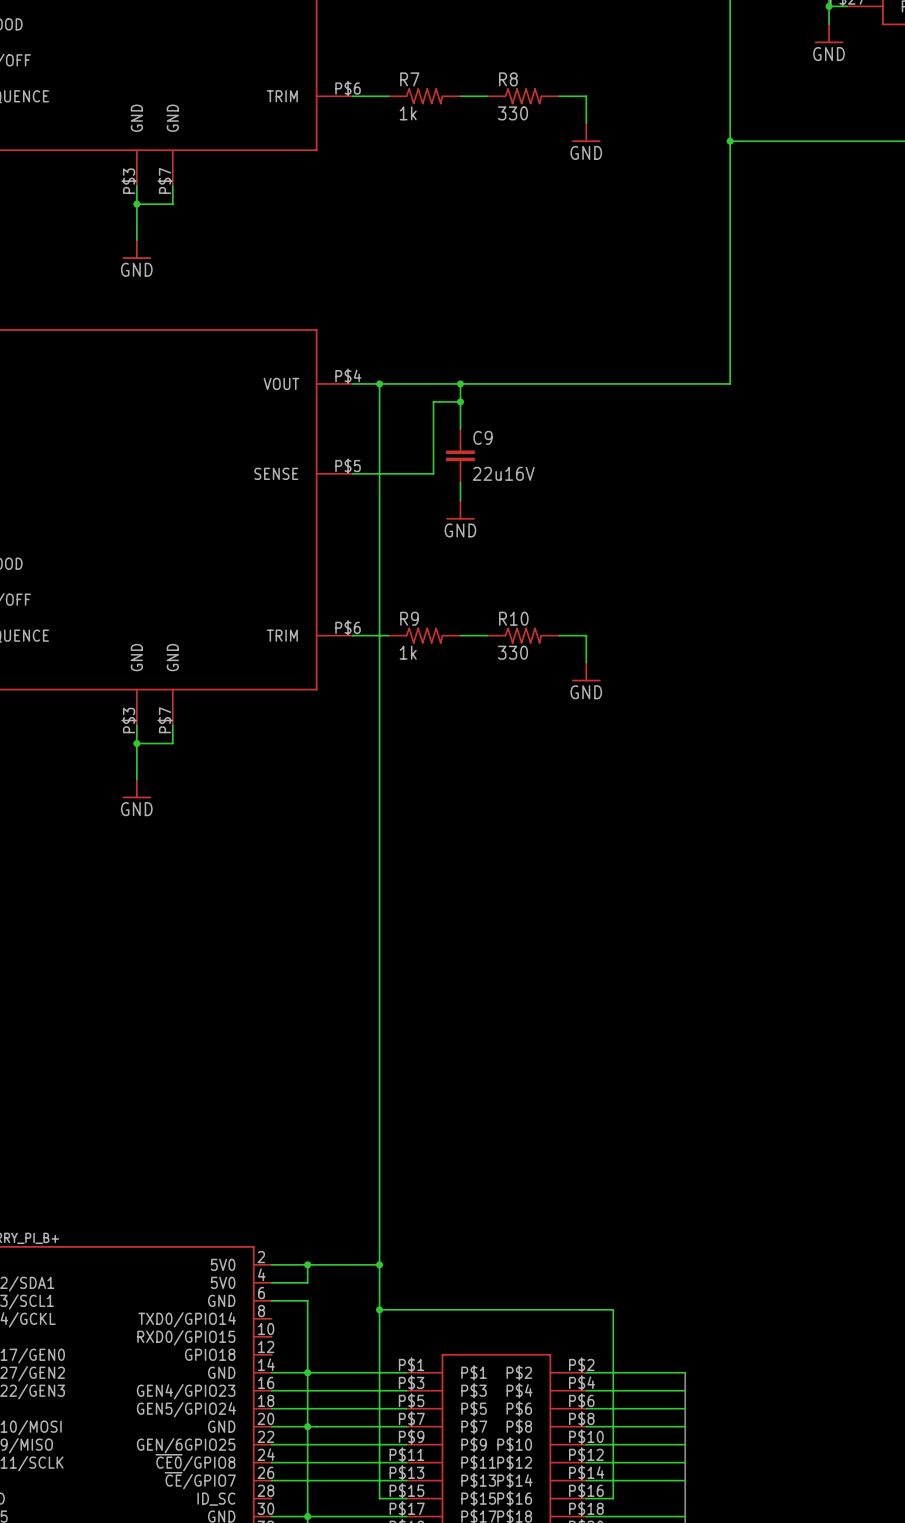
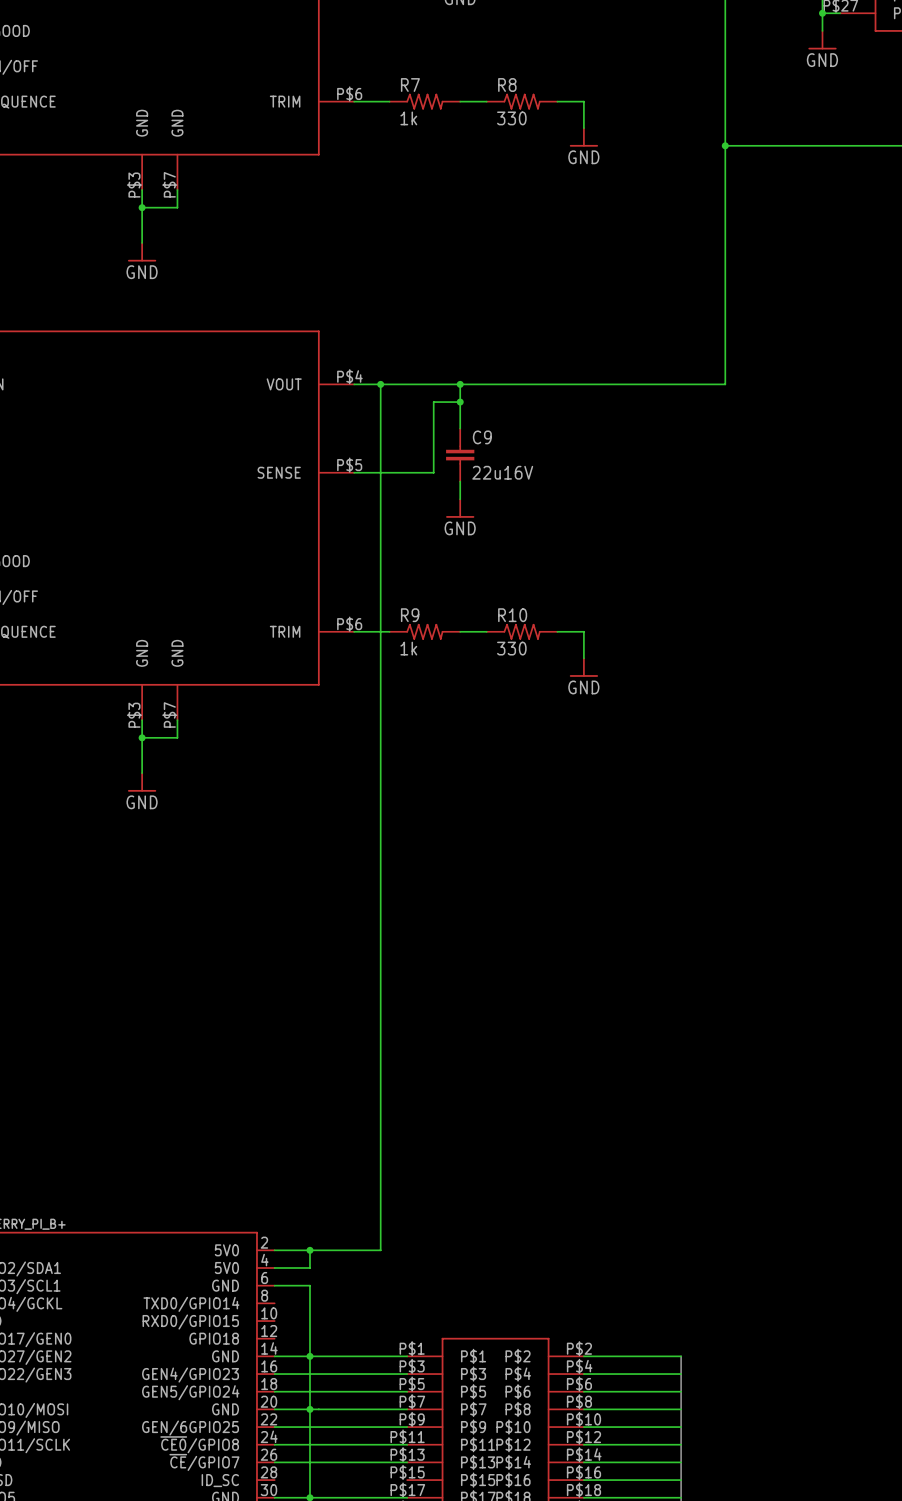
wire: (379, 1264) (379, 1498) (406, 1498) -> none
junction: (379, 1264) -> none
wire: (379, 1309) (613, 1309) (613, 1498) -> (681, 1480) (610, 1480)
junction: (379, 1309) -> none

